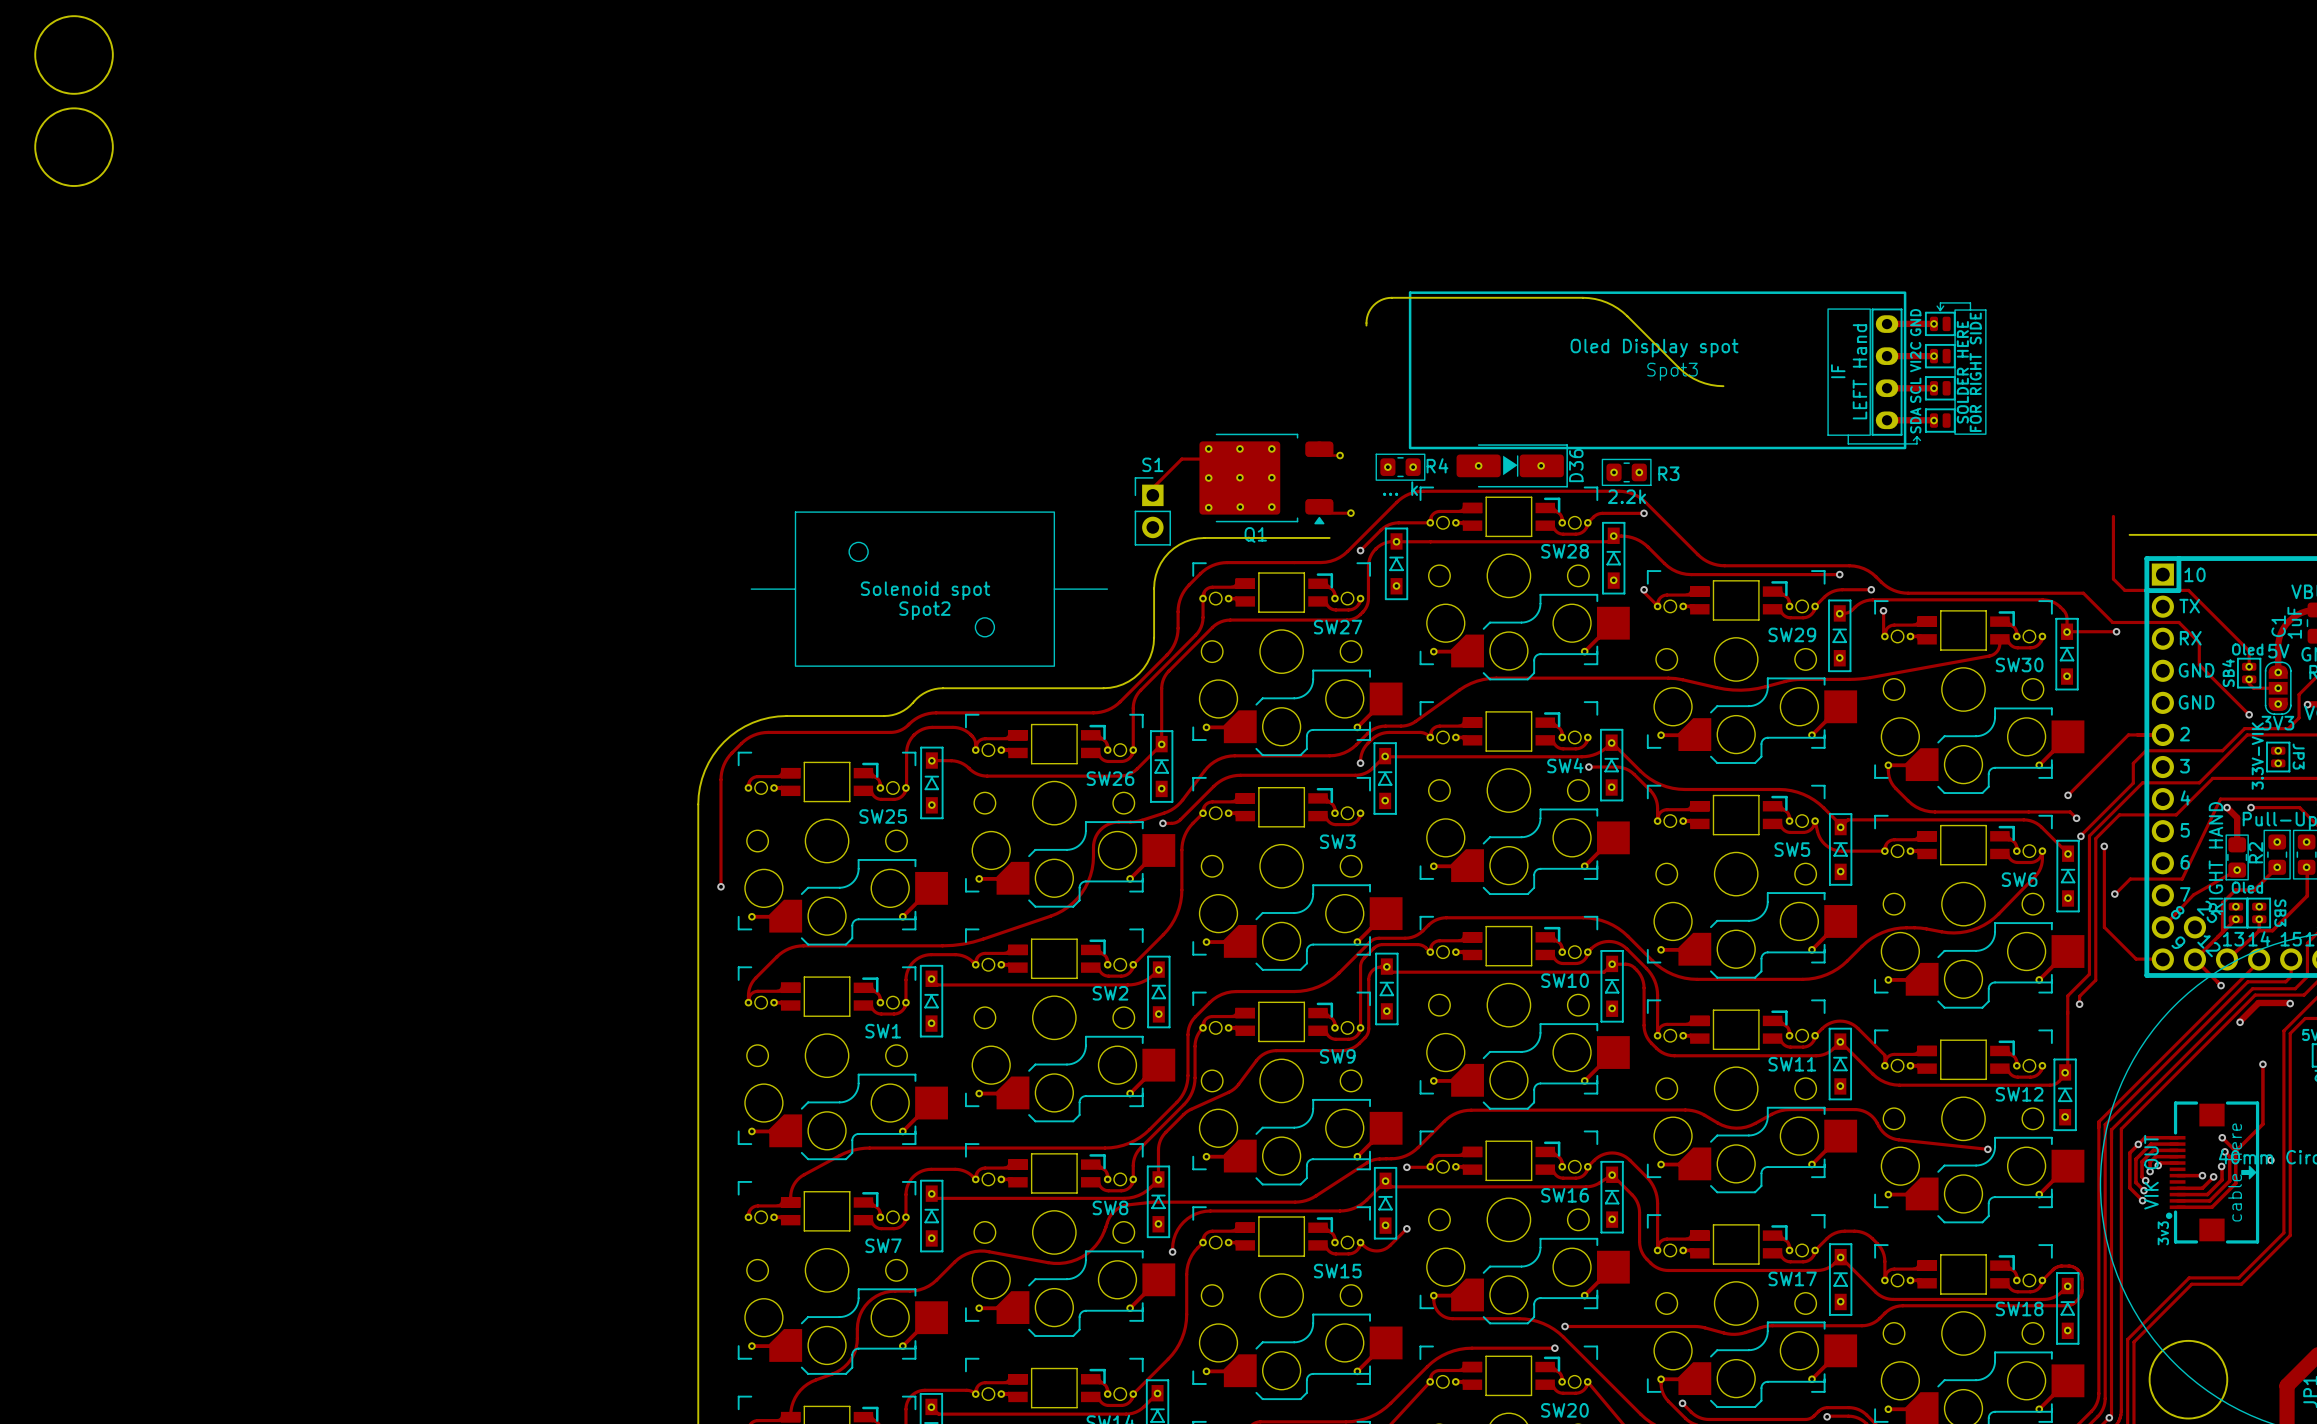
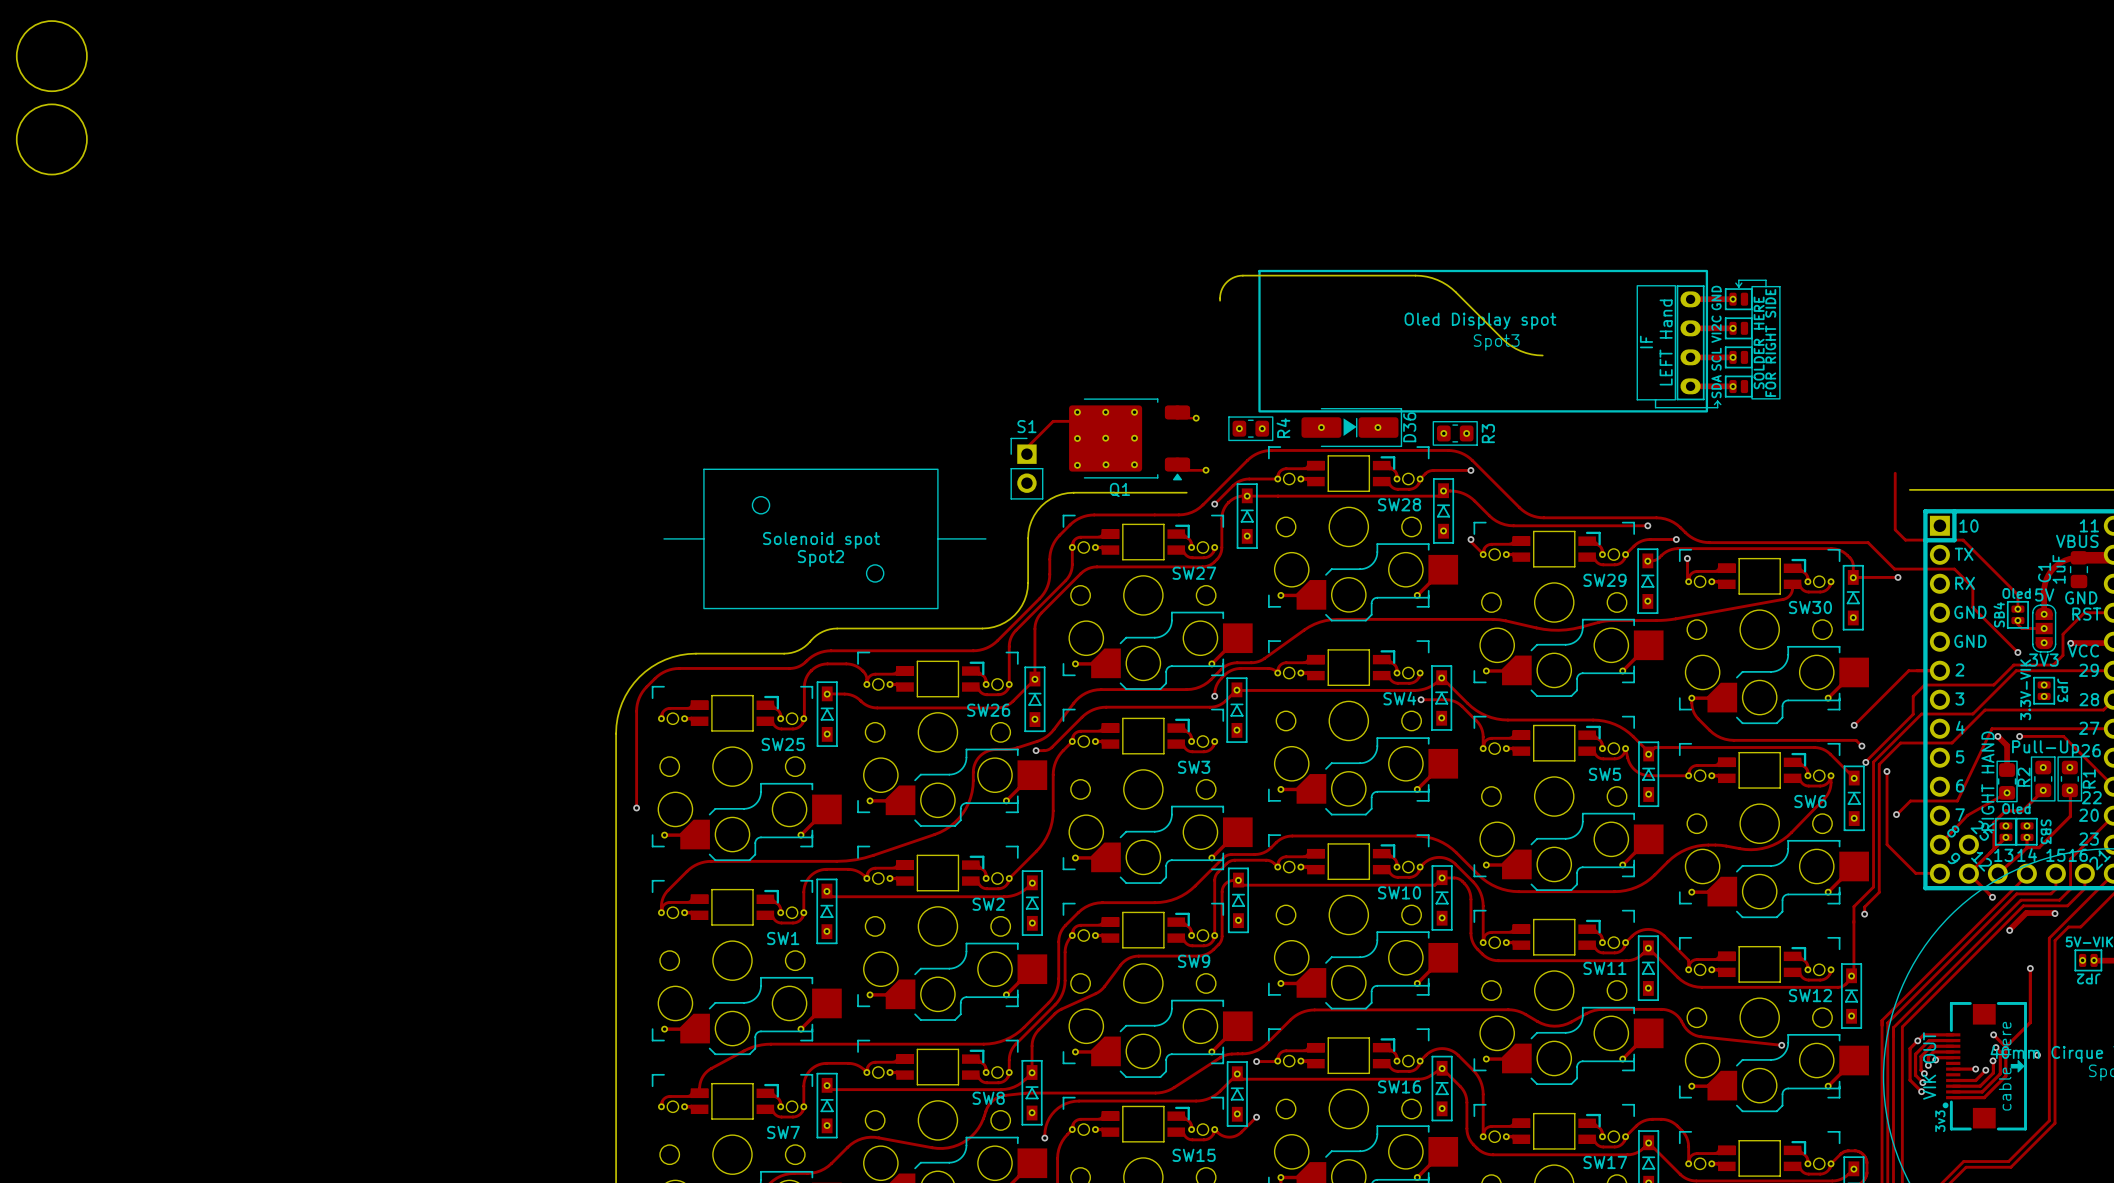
R4 name rotation: 0° (1437, 465) -> 90° counterclockwise (1283, 428)
R3 name rotation: 0° (1668, 473) -> 90° counterclockwise (1488, 433)
R4 text: ... k (1400, 488) -> none
R3 text: 2.2k (1626, 496) -> none

